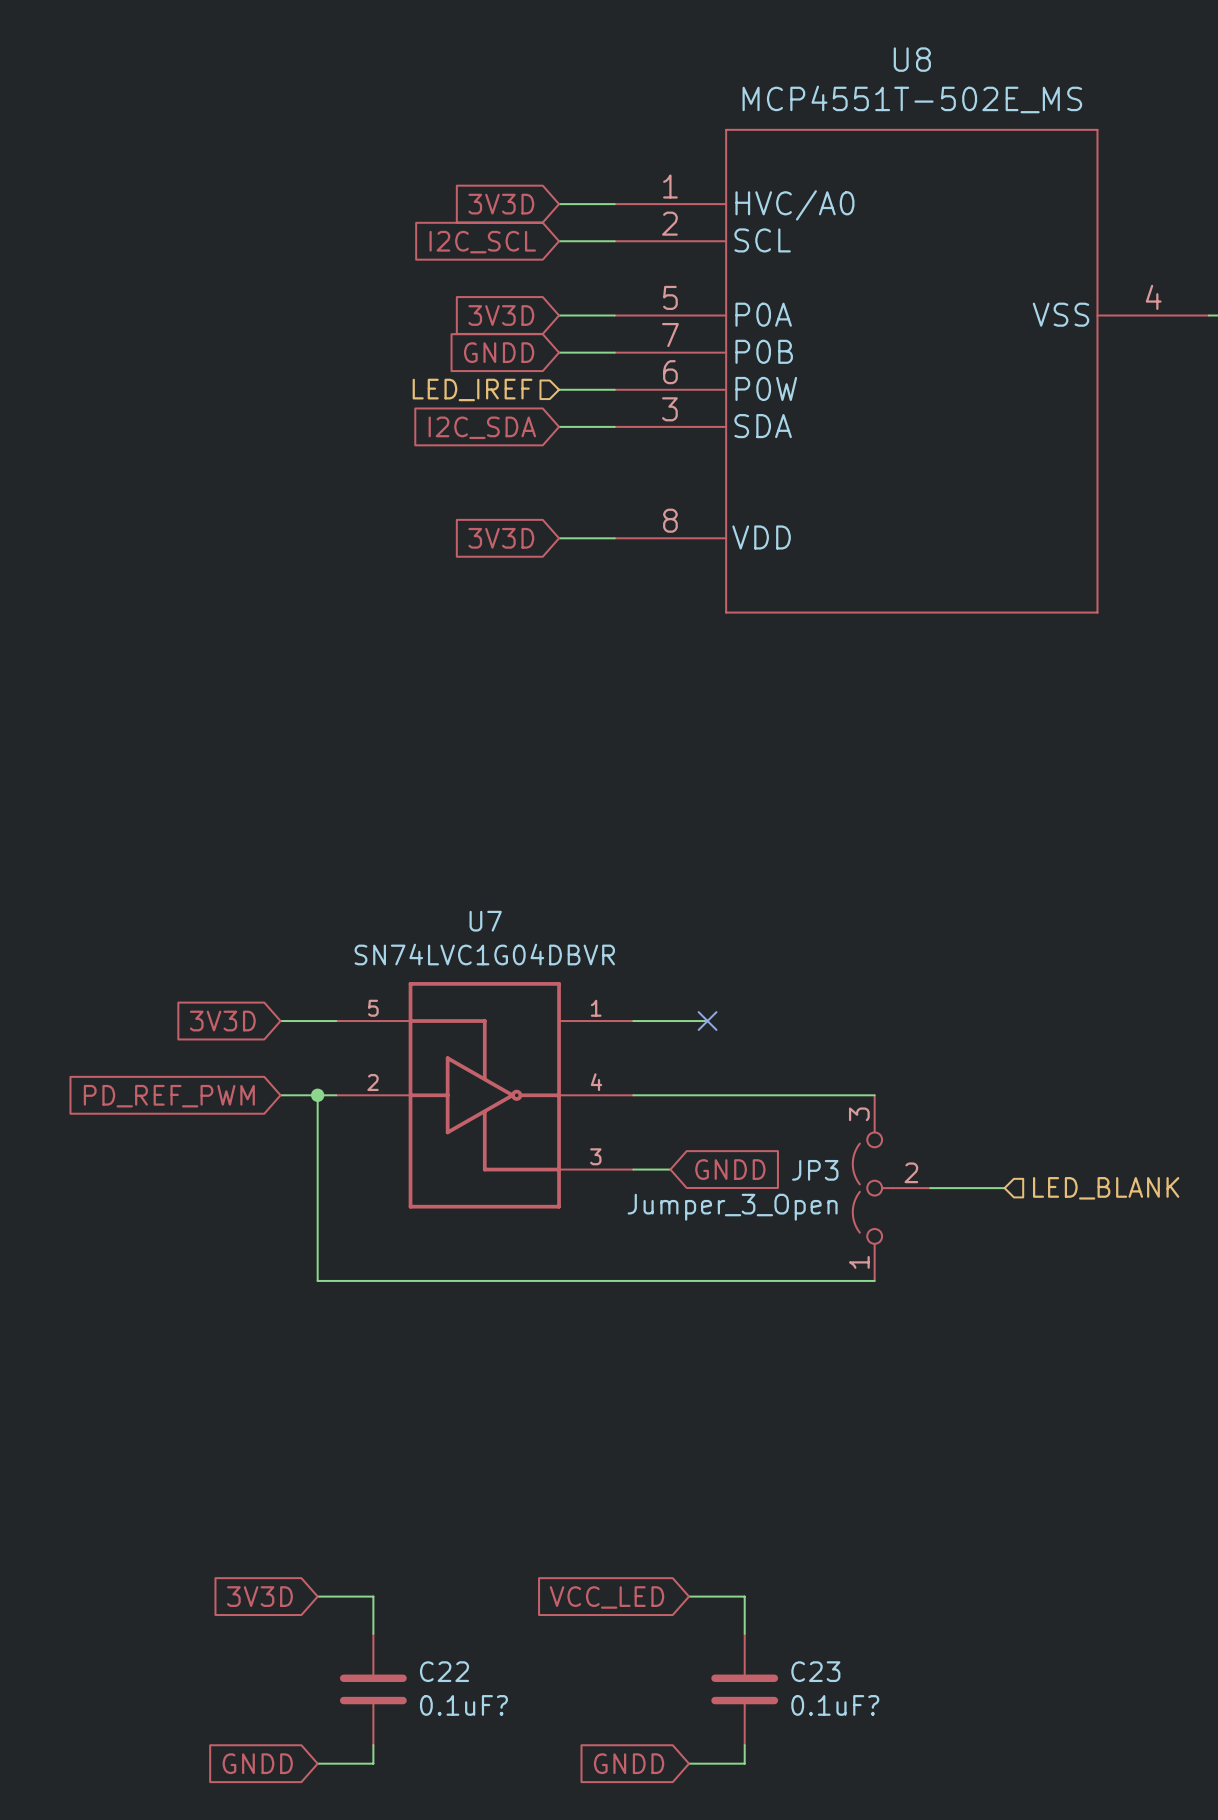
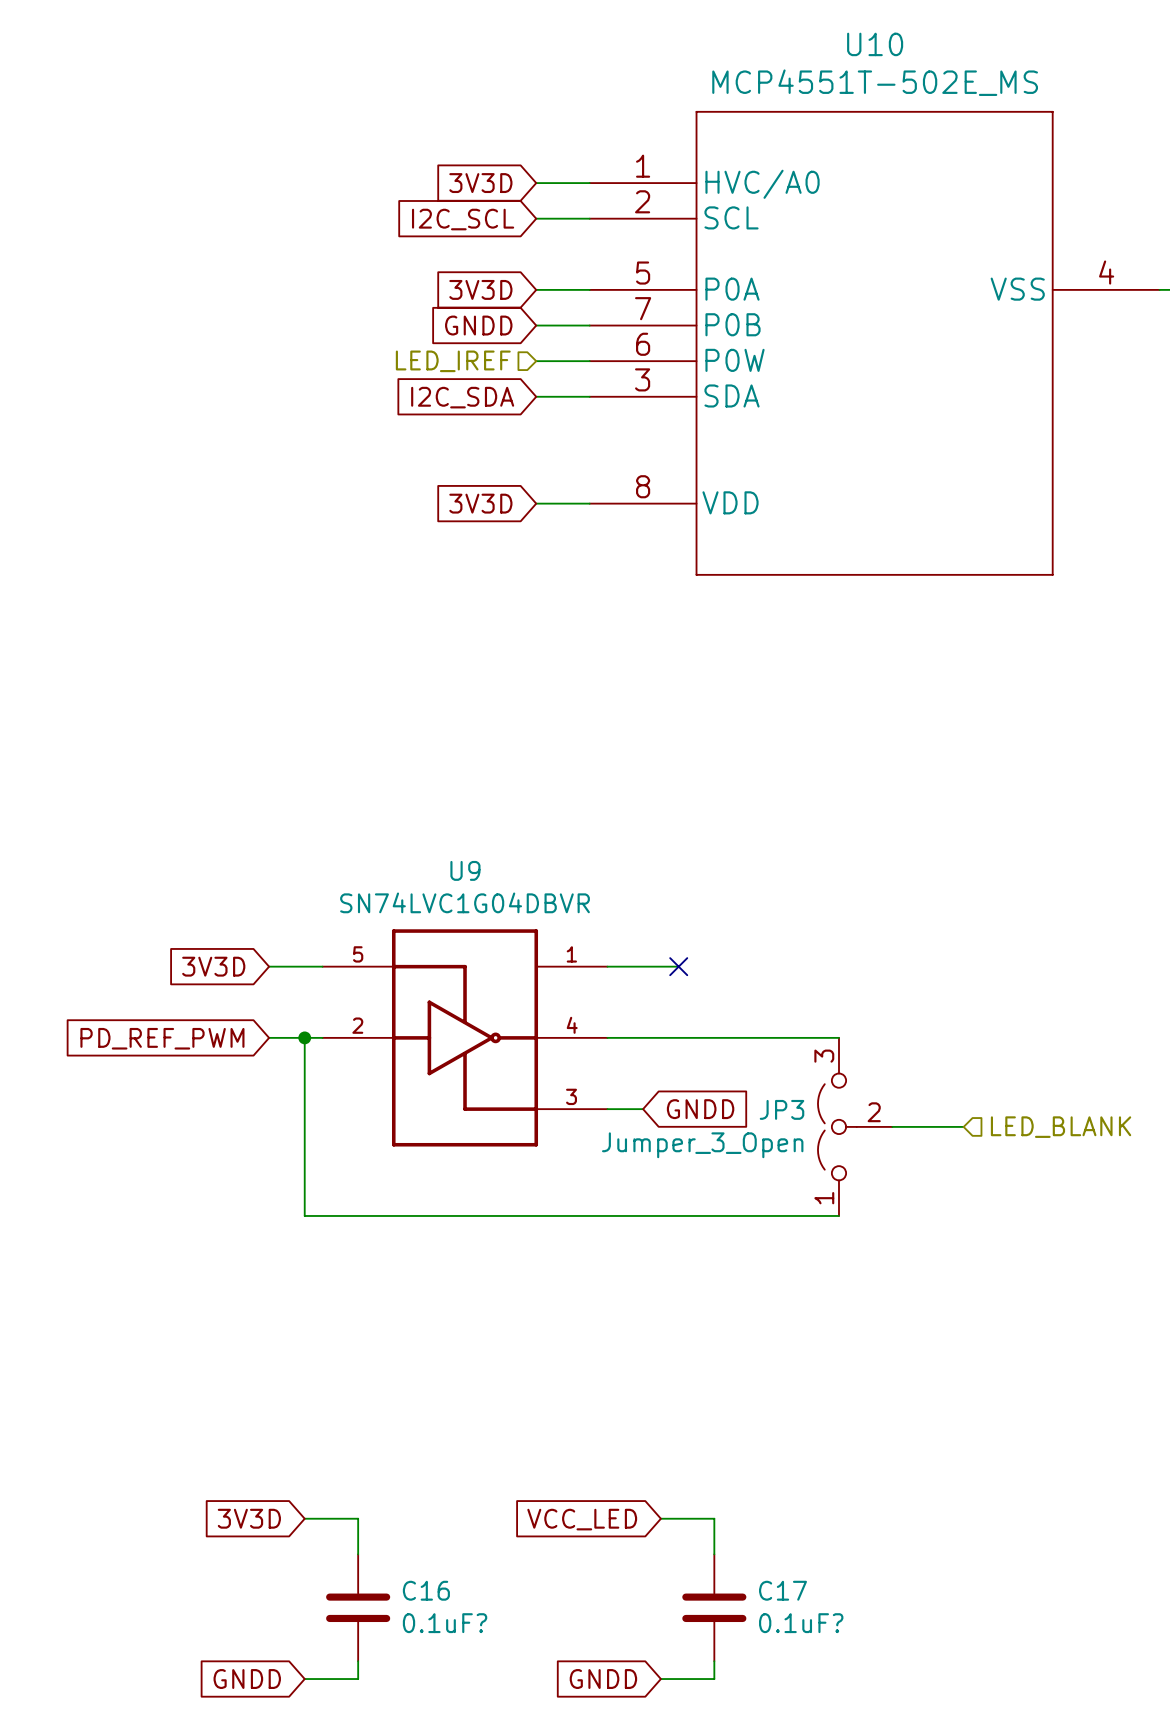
U8 name: U8 (912, 59) -> U10 (875, 44)
U7 name: U7 (485, 921) -> U9 (465, 870)
C22 name: C22 (444, 1671) -> C16 (426, 1590)
C23 name: C23 (815, 1671) -> C17 (782, 1590)

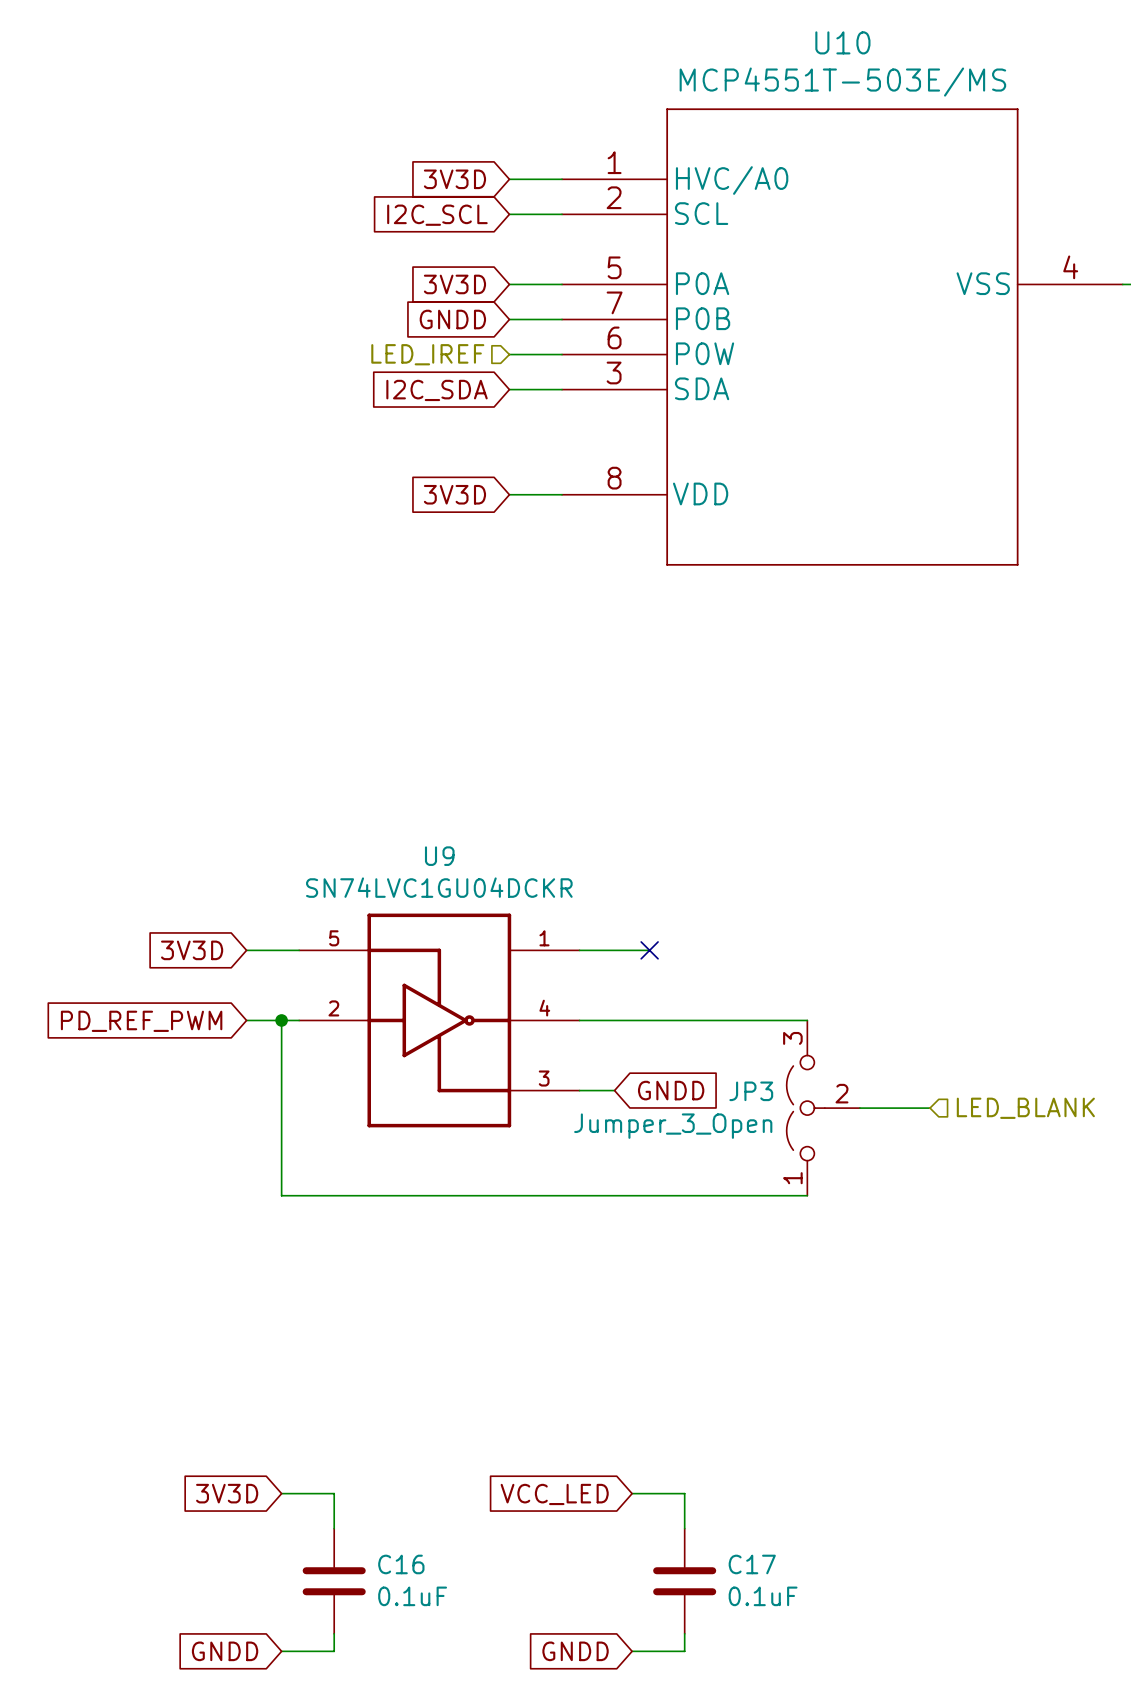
U10 value: MCP4551T-502E_MS (875, 82) -> MCP4551T-503E/MS (842, 82)
U9 value: SN74LVC1G04DBVR (465, 902) -> SN74LVC1GU04DCKR (439, 887)
C16 value: 0.1uF? (445, 1623) -> 0.1uF (412, 1596)
C17 value: 0.1uF? (801, 1623) -> 0.1uF (763, 1596)

